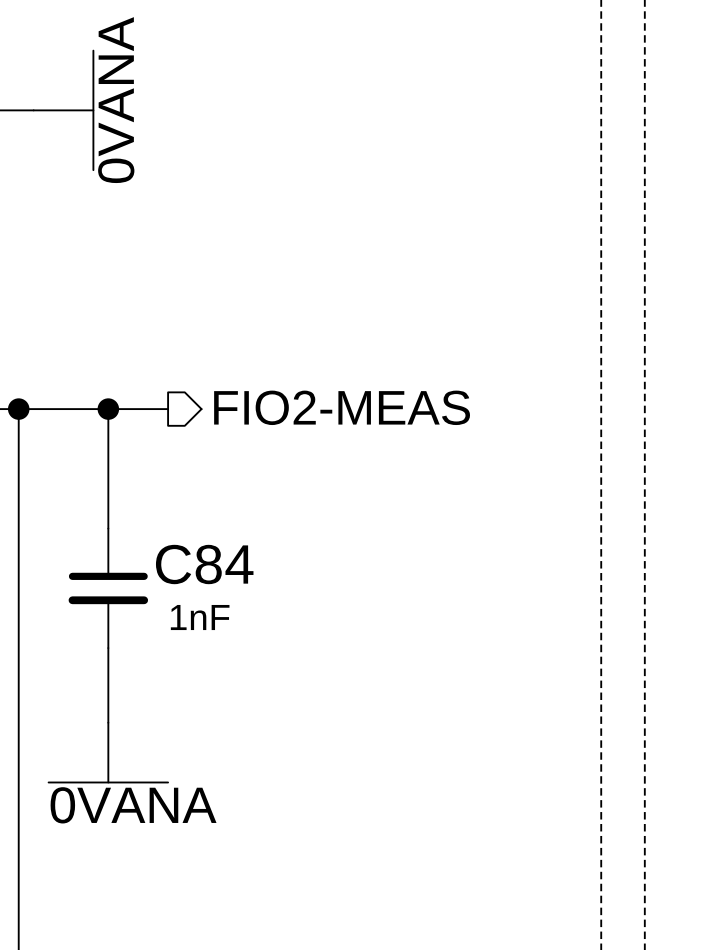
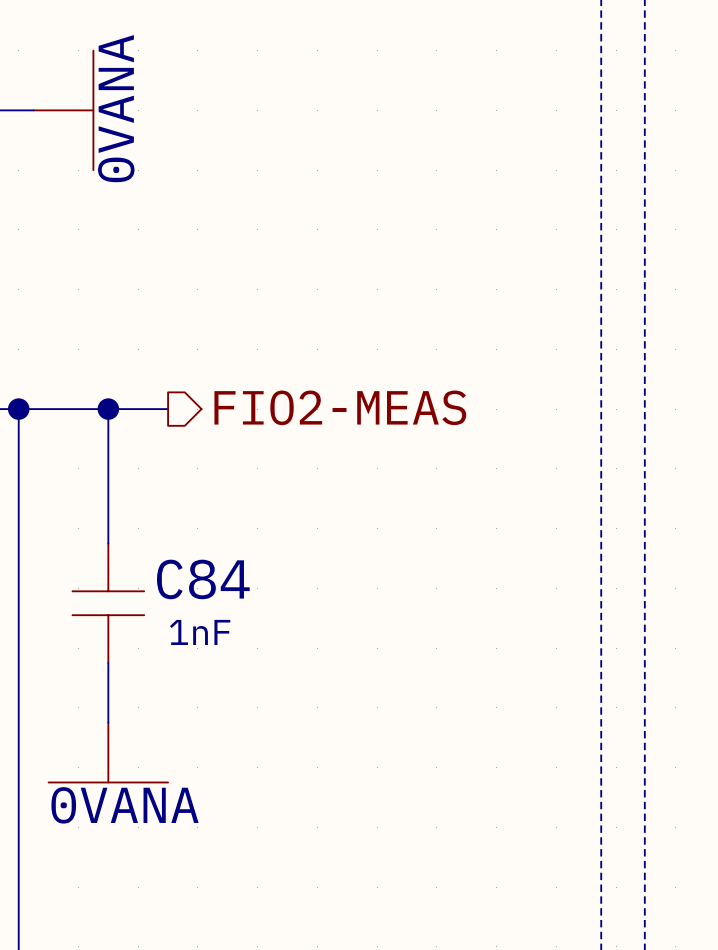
C84 symbol: [68, 528, 149, 649] -> [72, 543, 145, 663]

